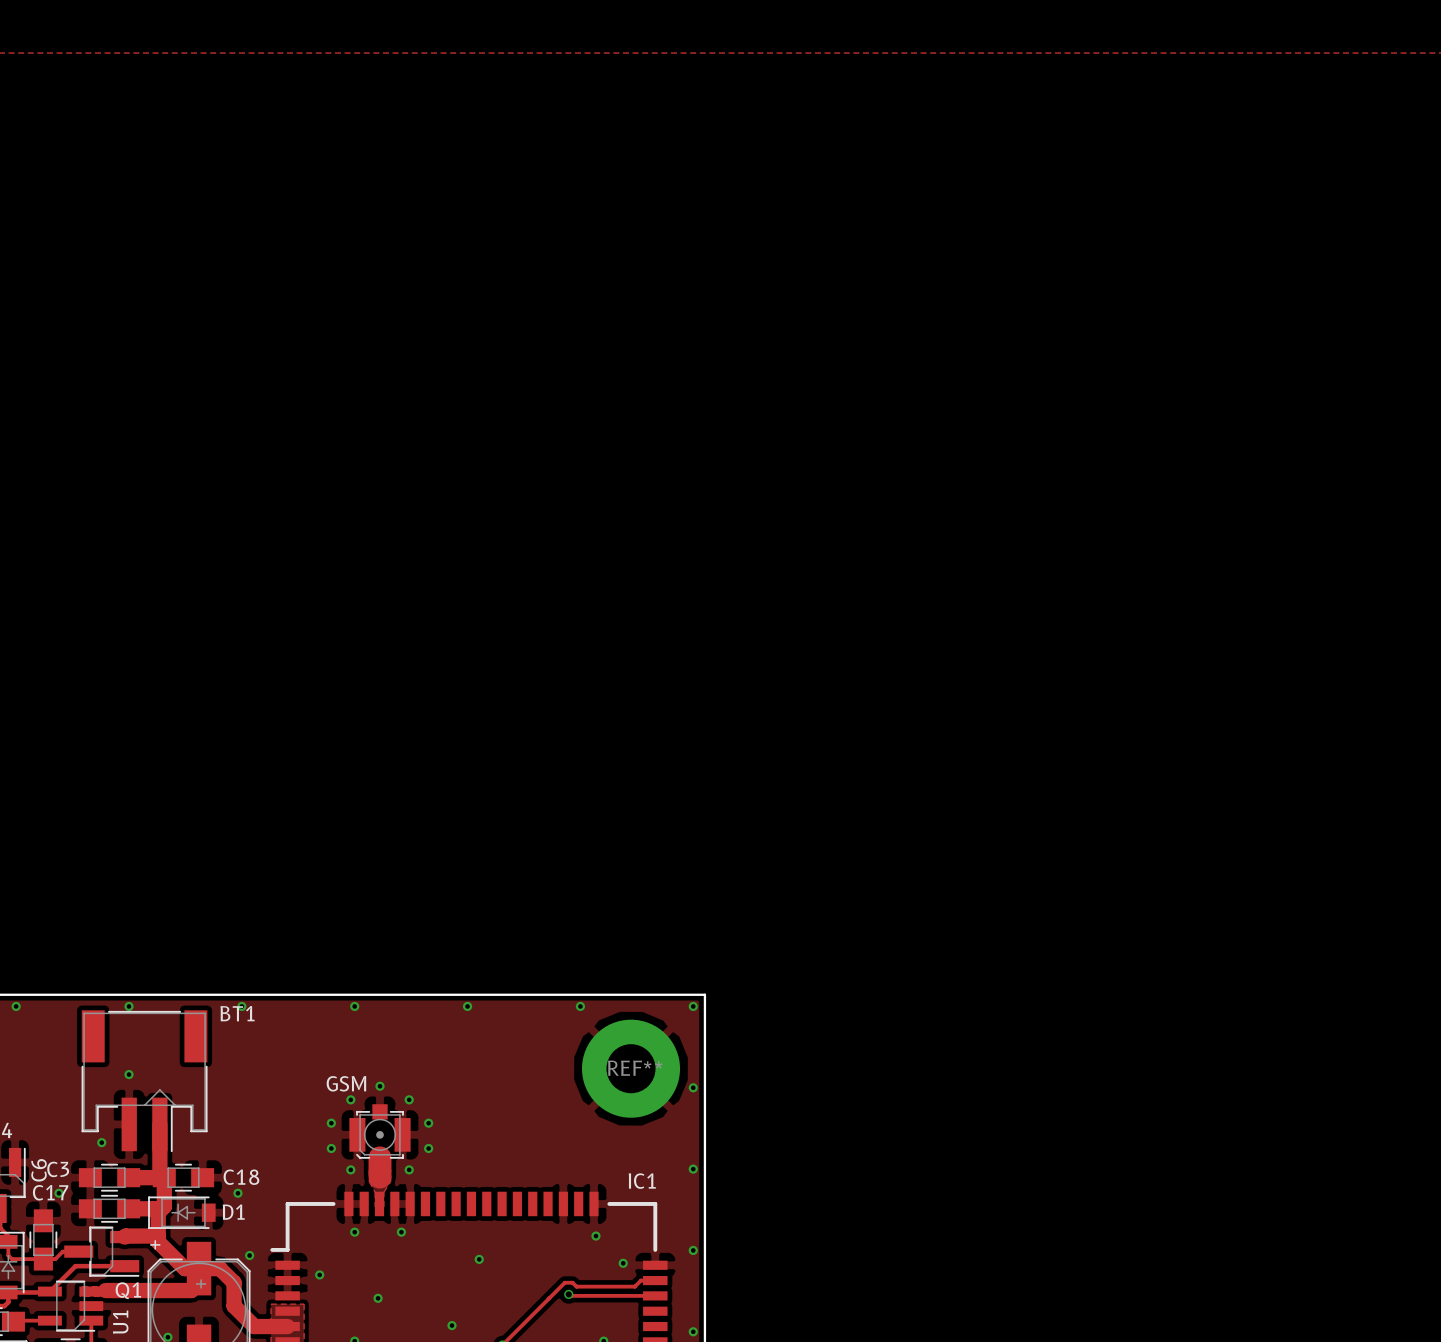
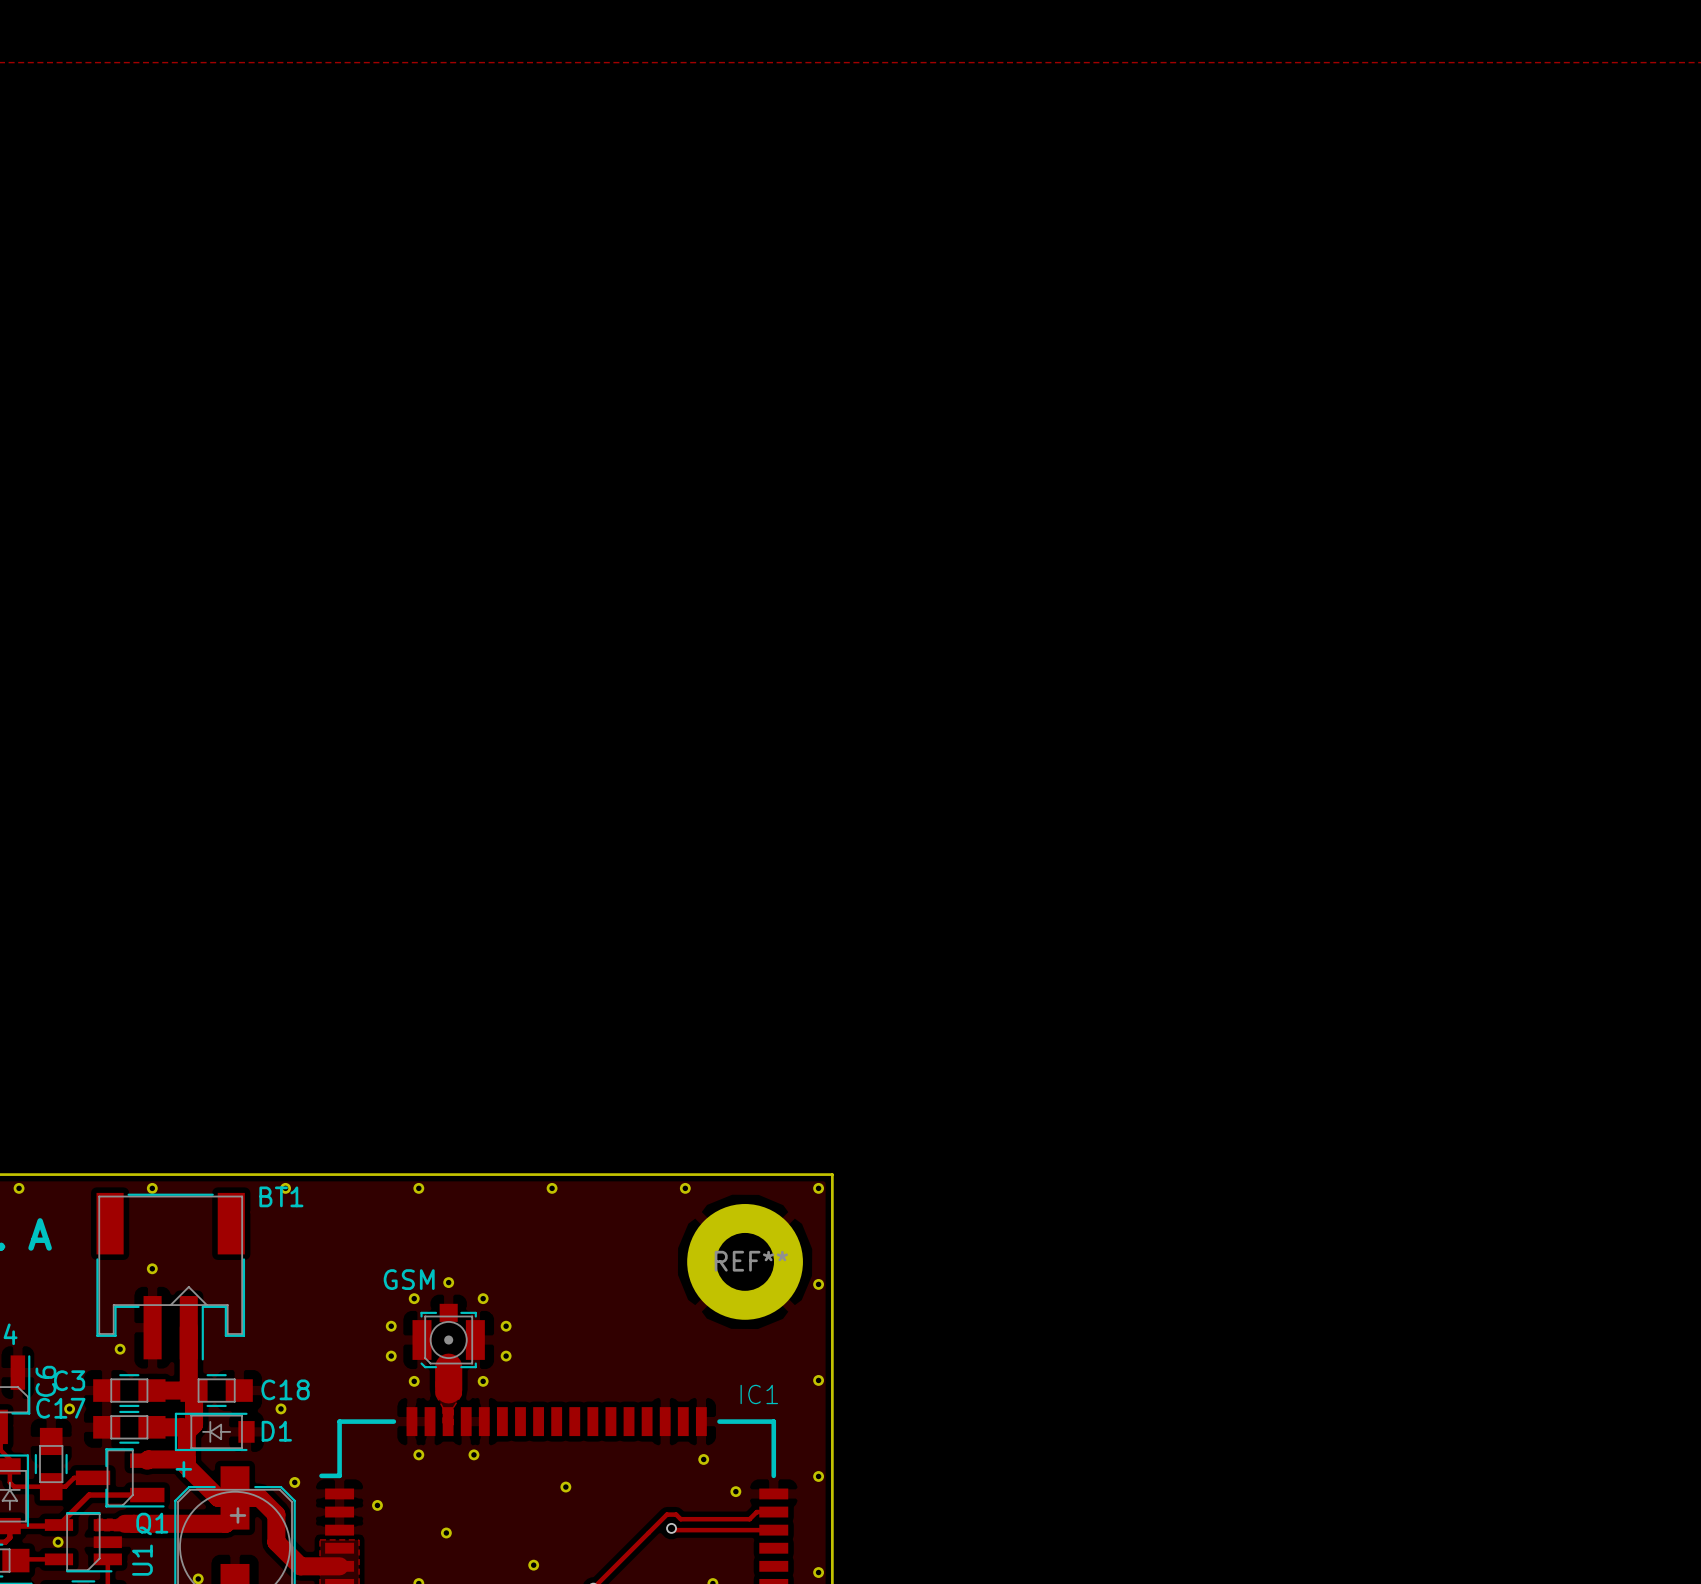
part: none -> (58, 1542)

